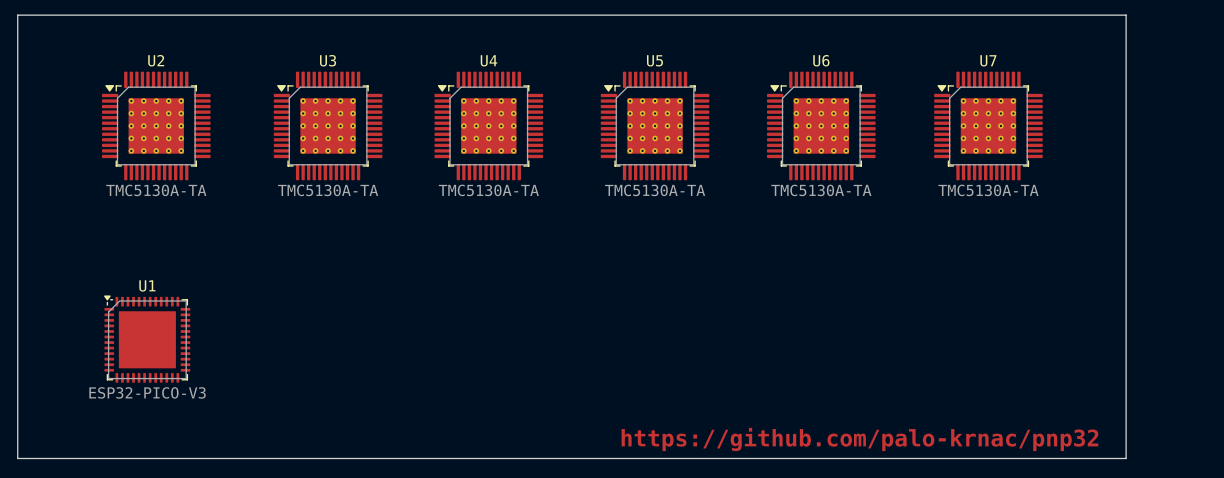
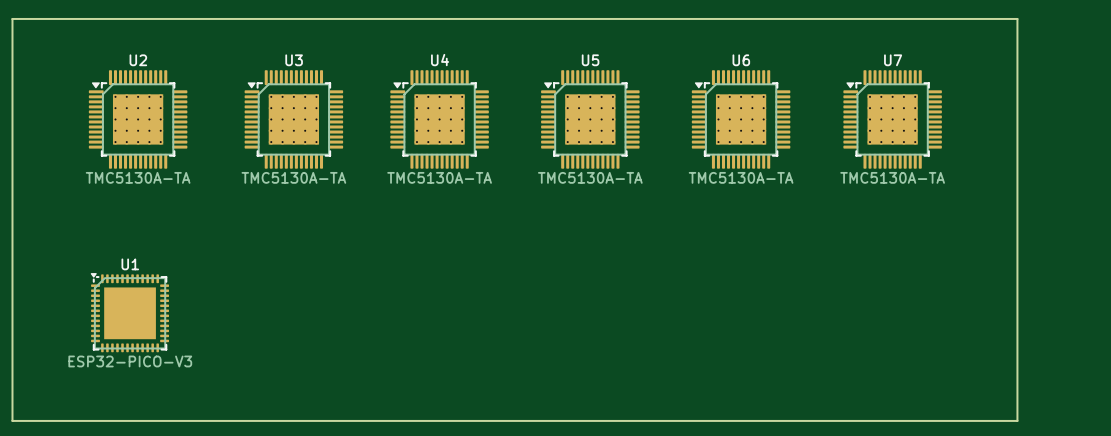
text: https://github.com/palo-krnac/pnp32 (859, 439) -> none

